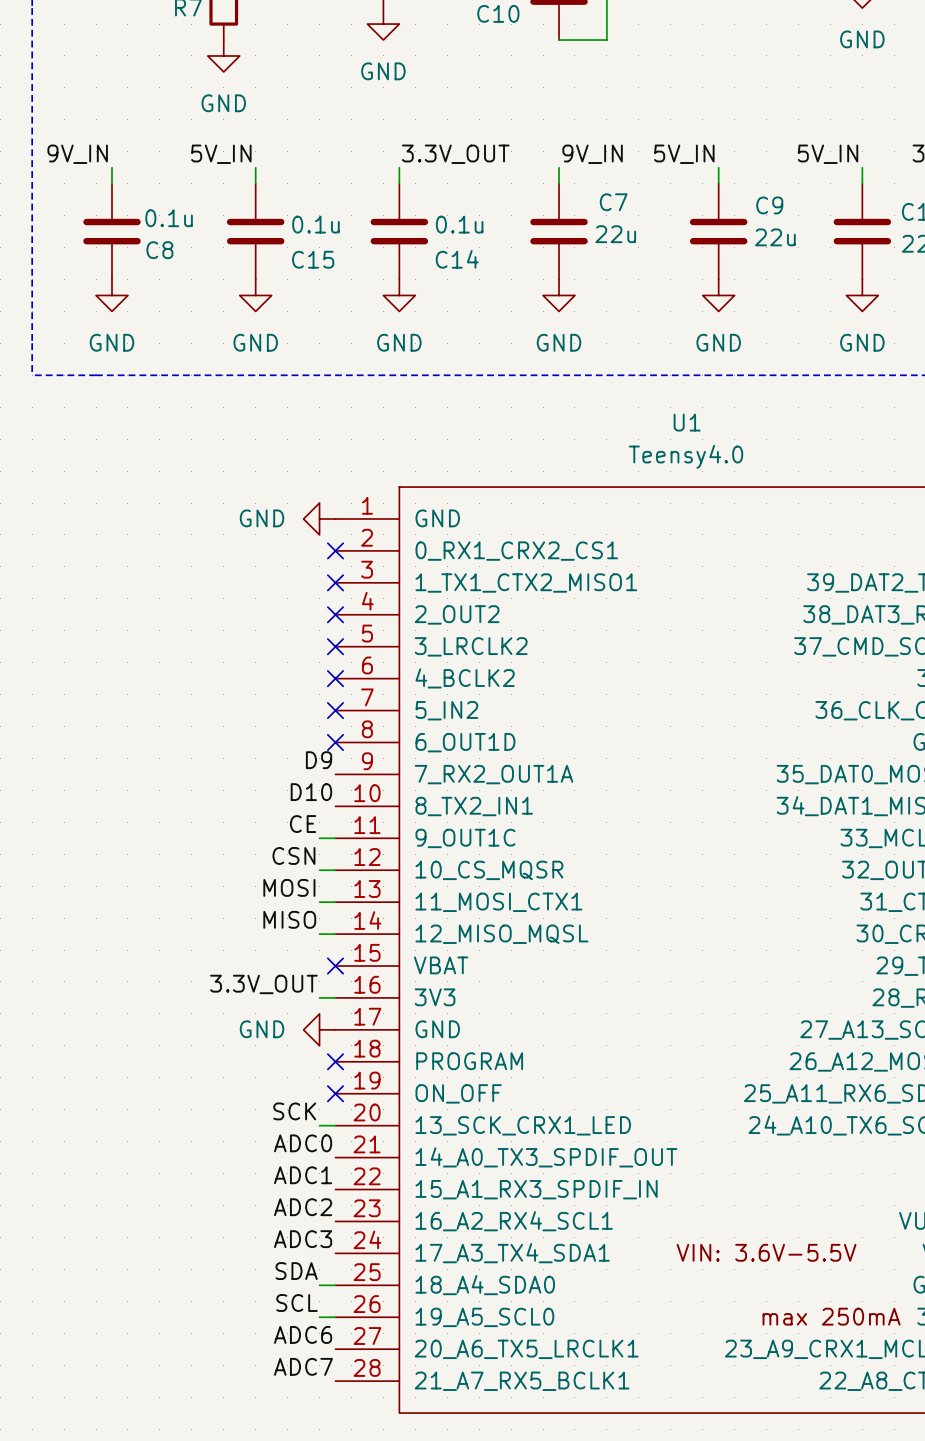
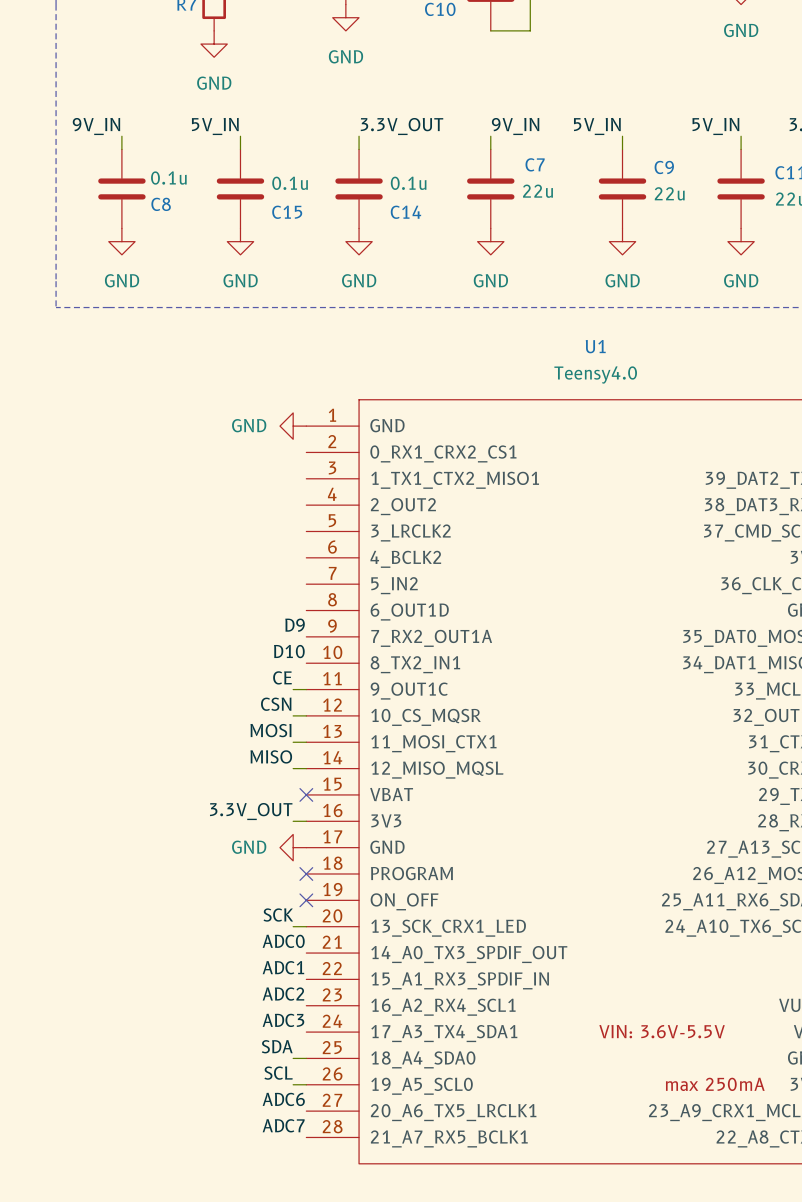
no-connect mark: (335, 550) -> none
no-connect mark: (335, 582) -> none
no-connect mark: (335, 614) -> none
no-connect mark: (335, 646) -> none
no-connect mark: (335, 678) -> none
no-connect mark: (335, 710) -> none
no-connect mark: (335, 742) -> none

